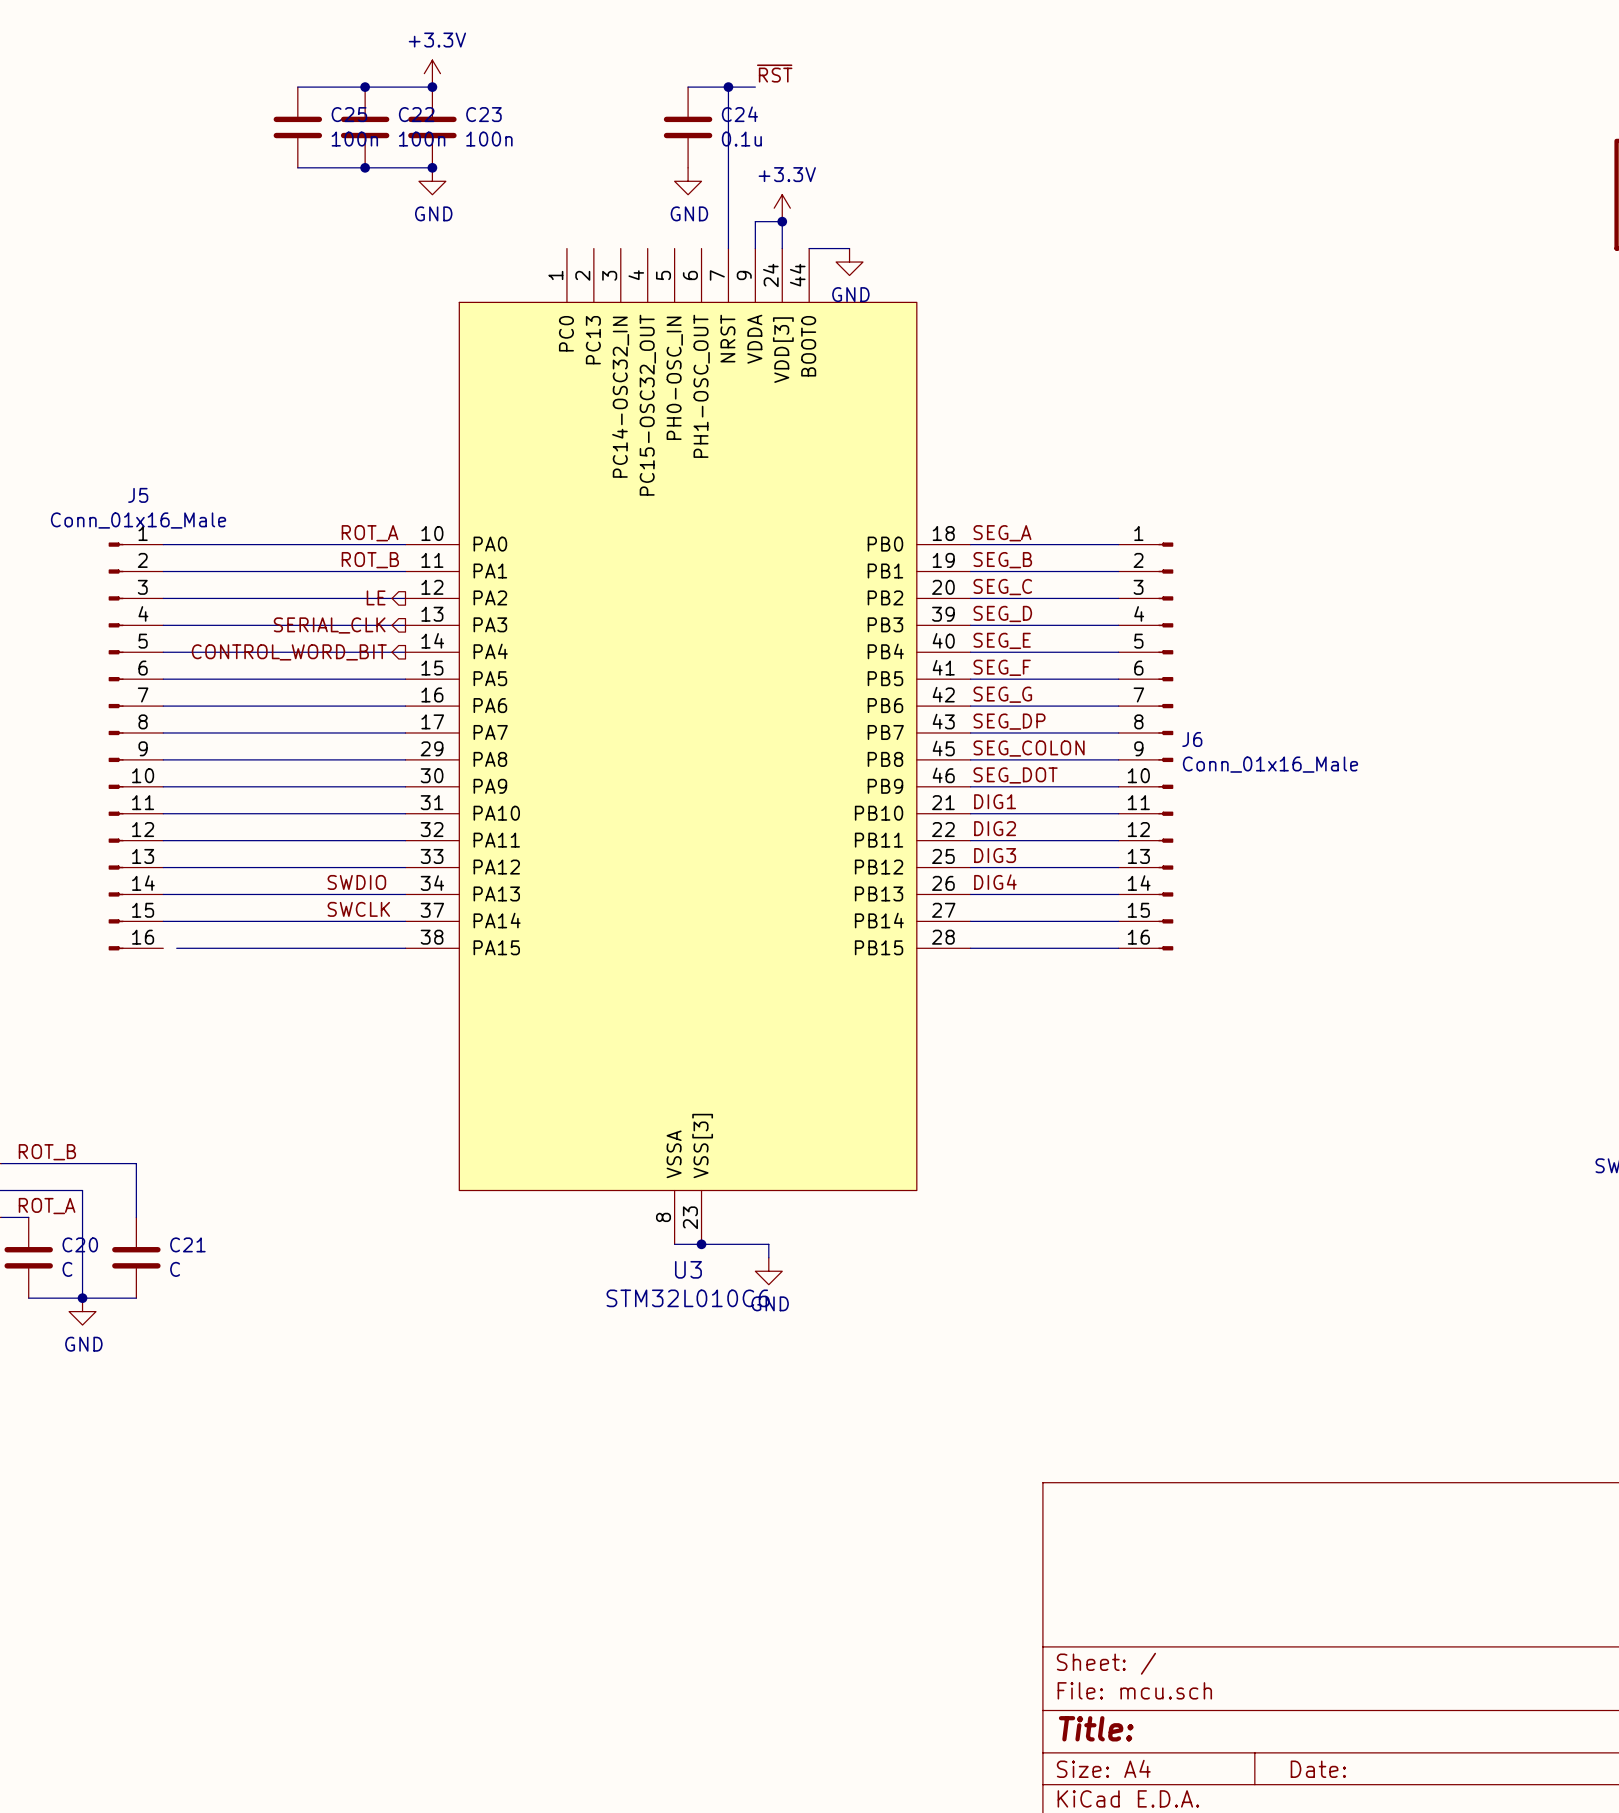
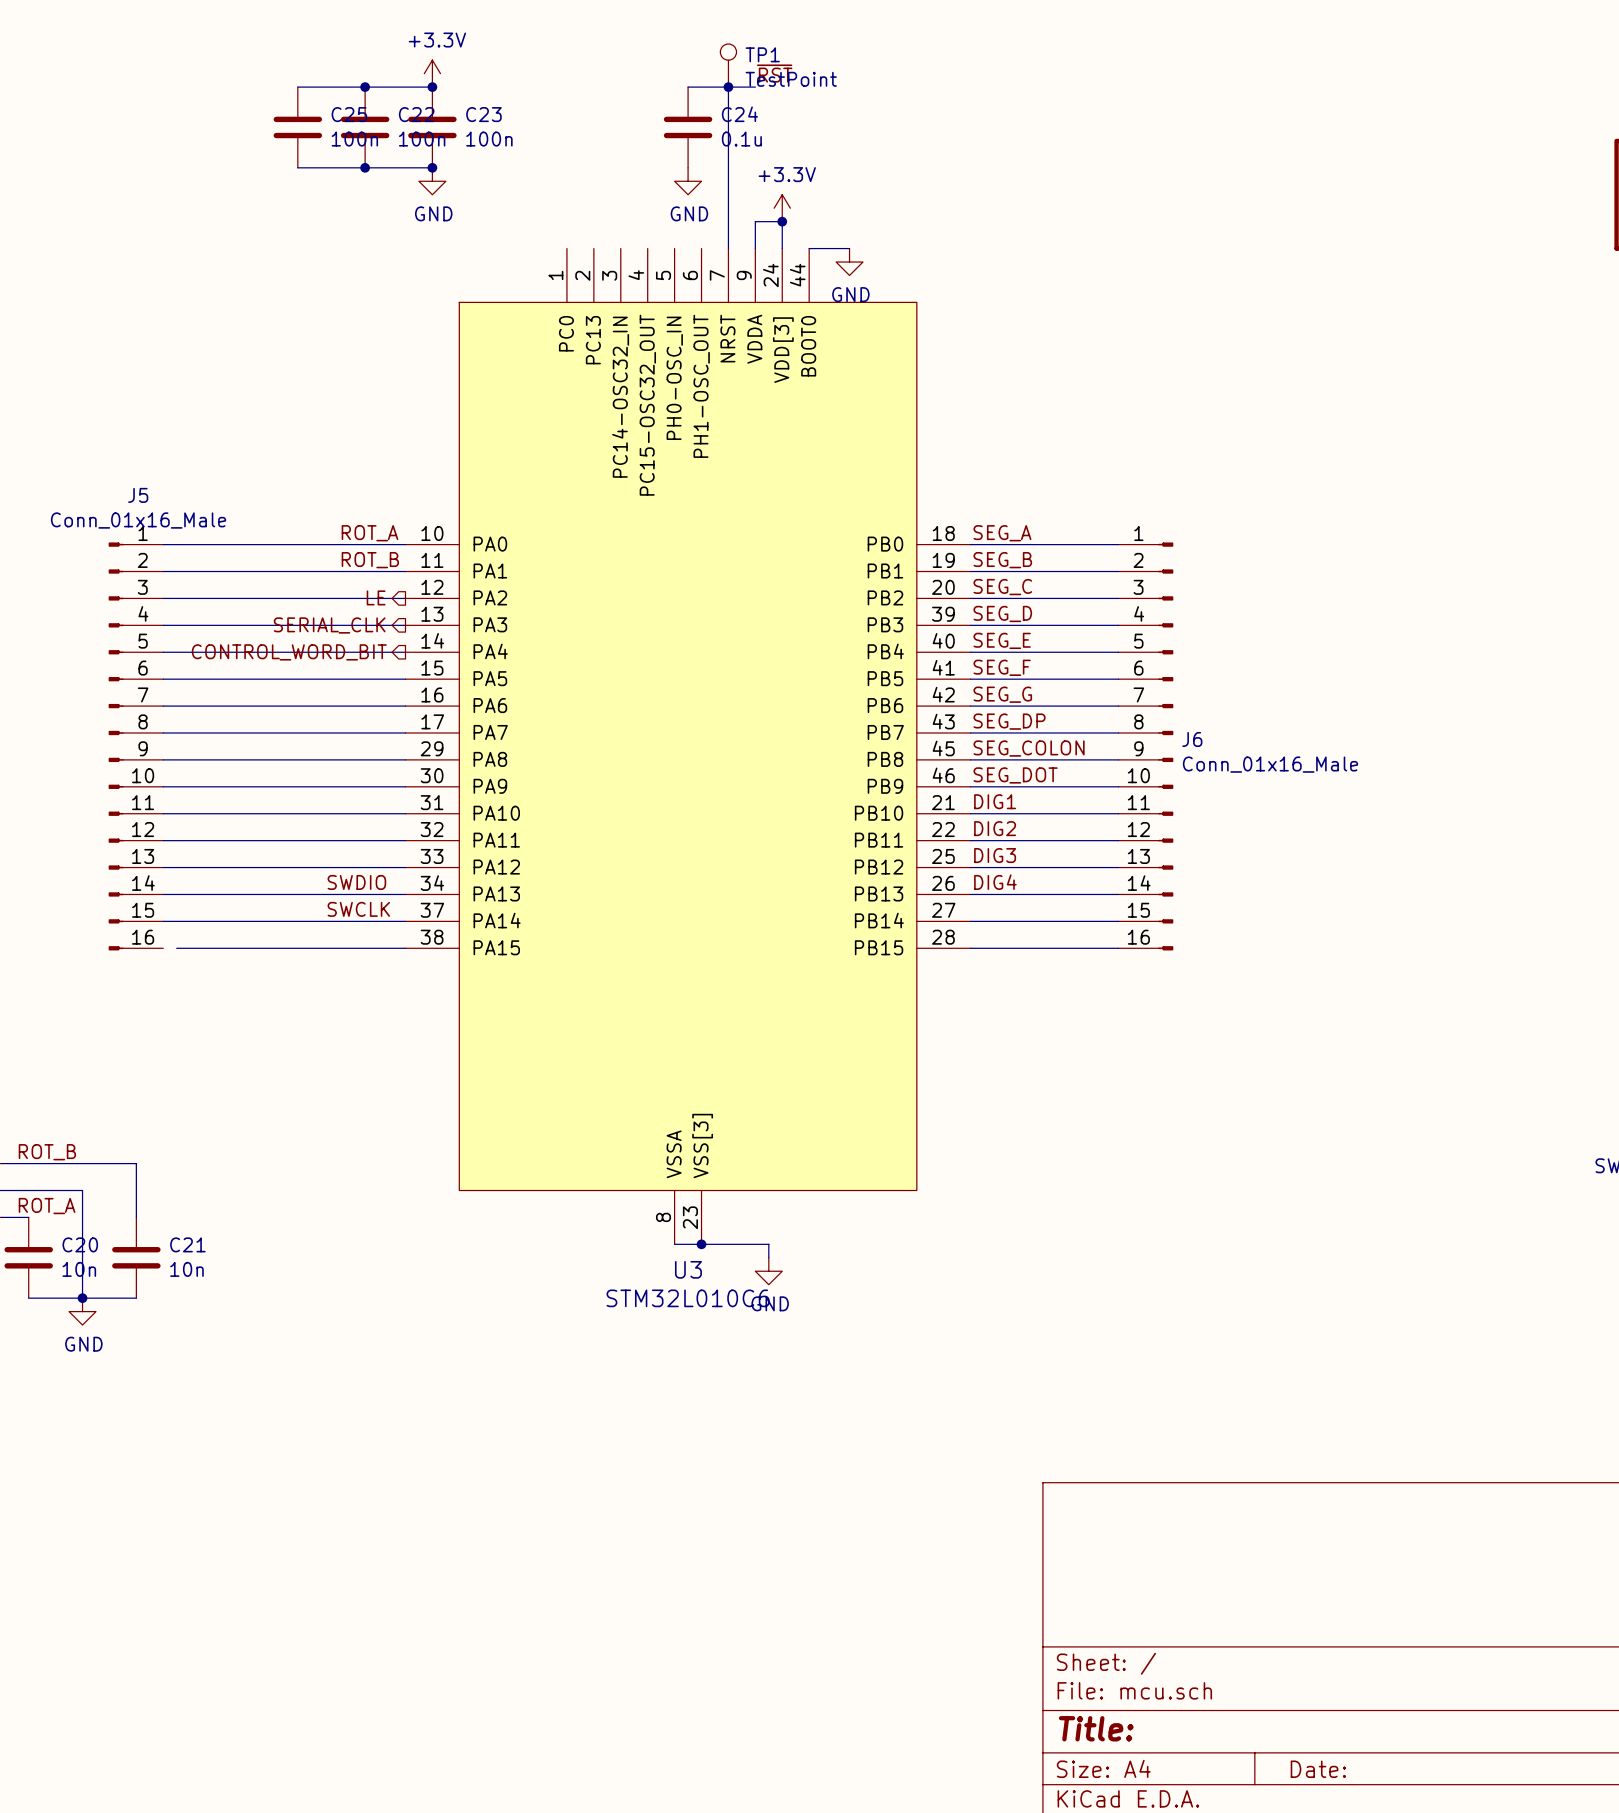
TP1: none -> TestPoint (728, 65)
C20 value: C (67, 1269) -> 10n (79, 1269)
C21 value: C (175, 1269) -> 10n (186, 1269)

